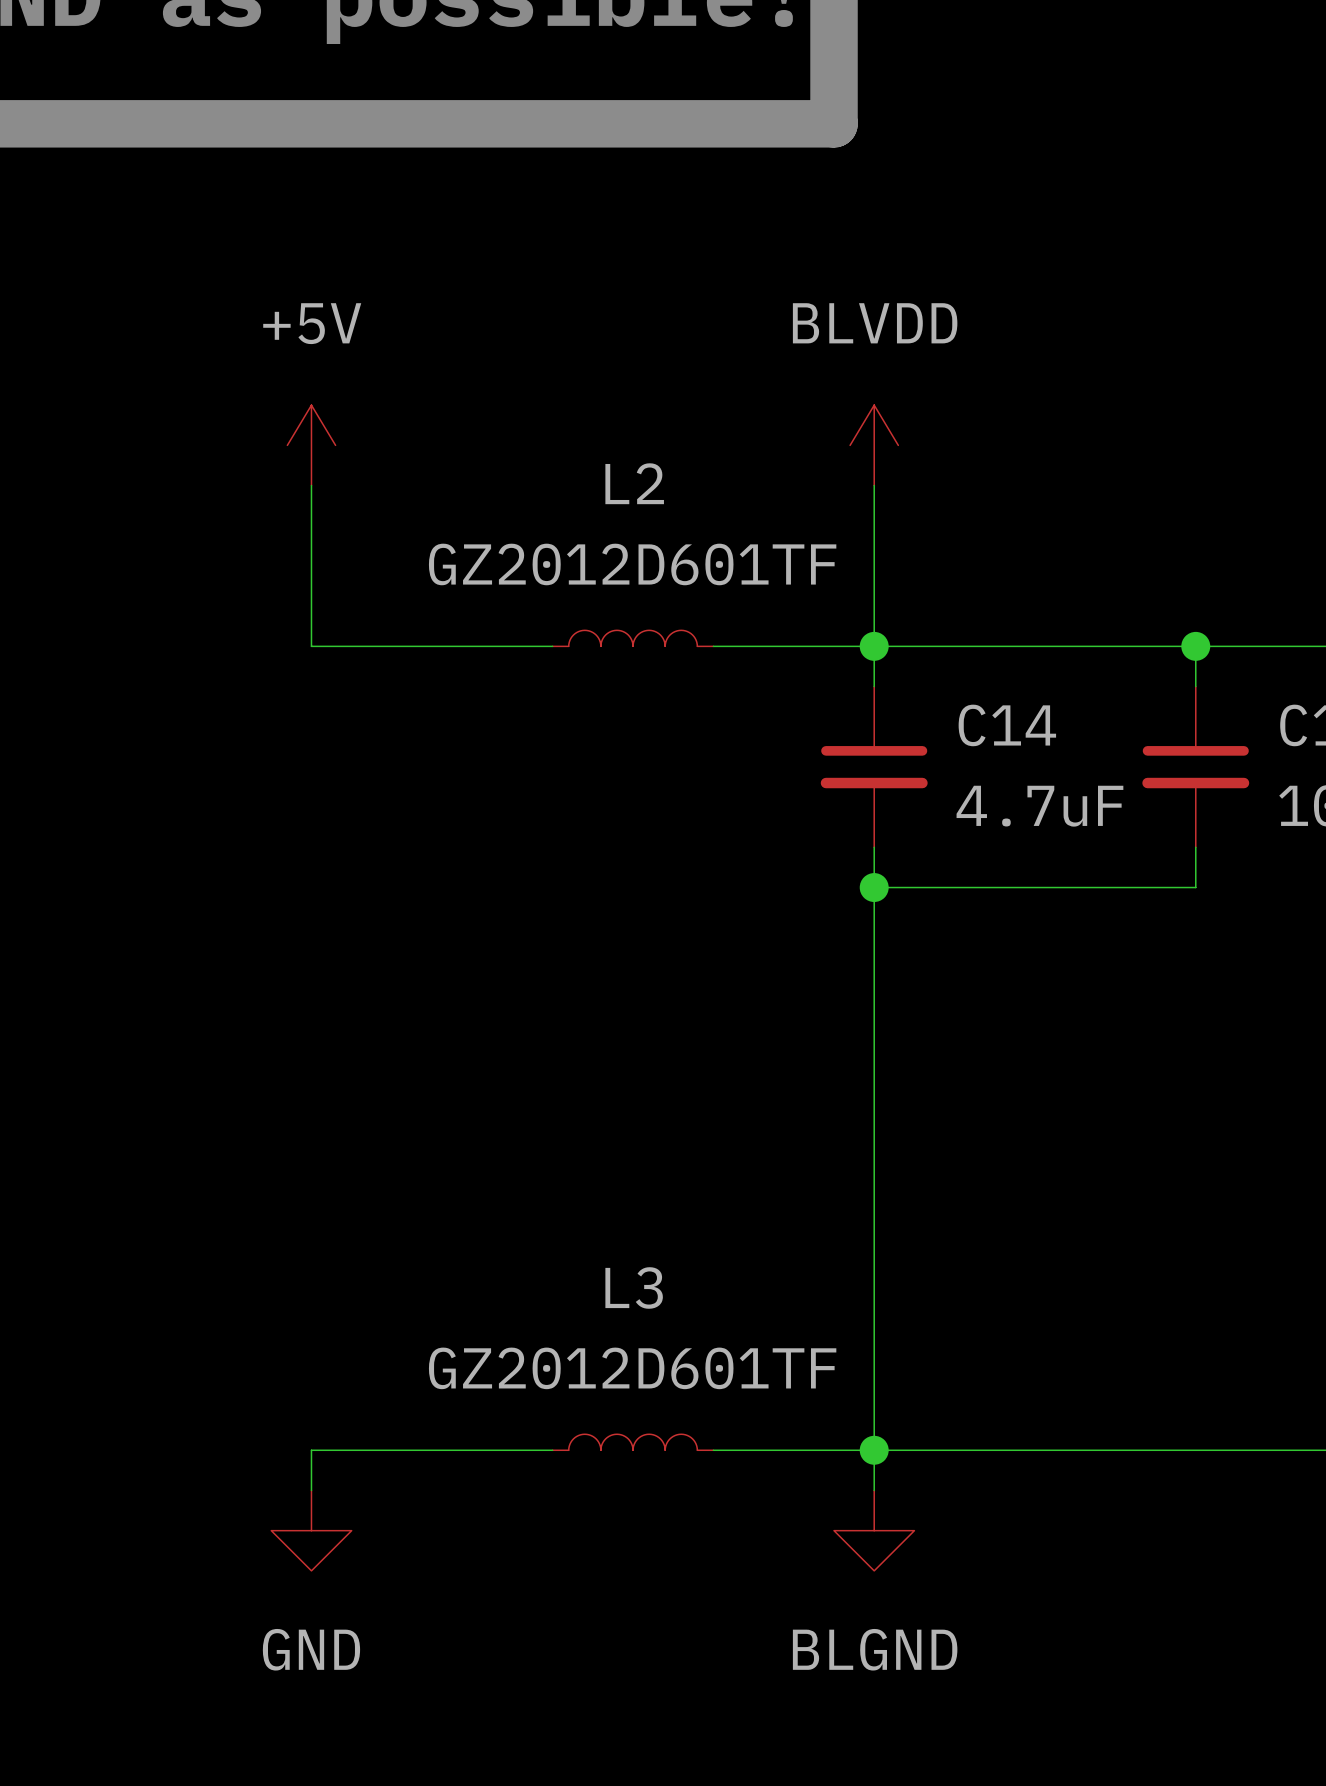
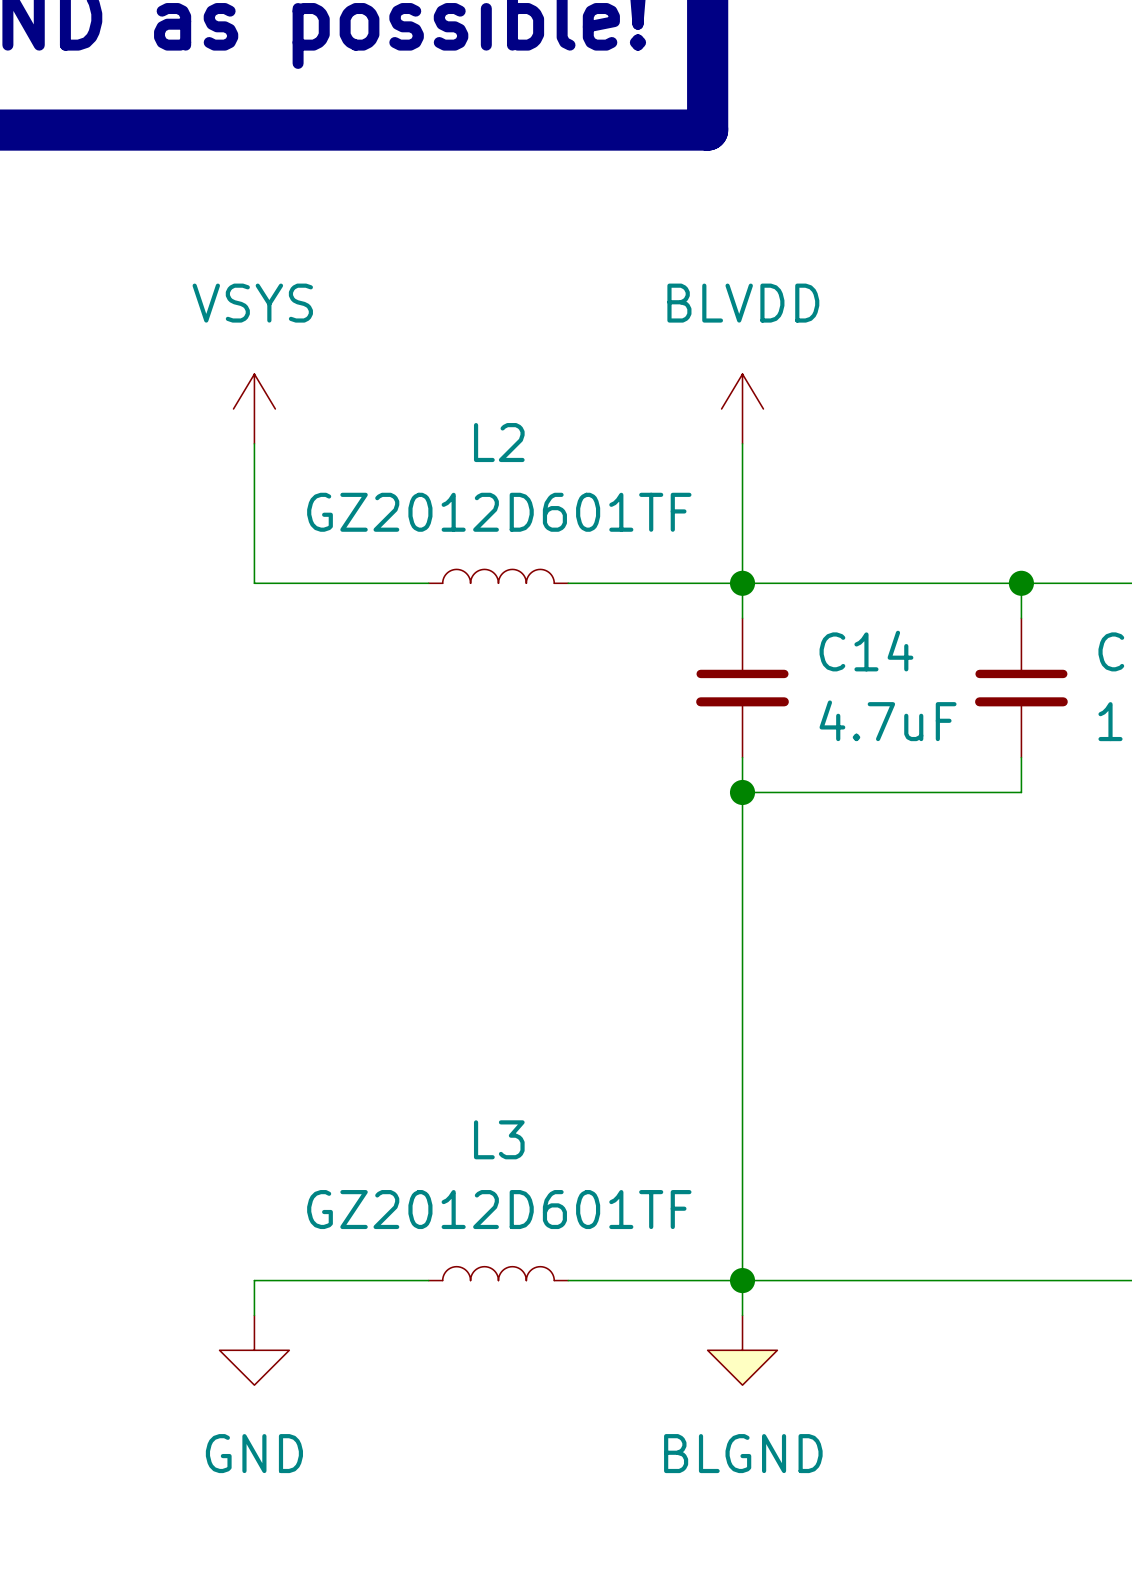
power symbol: +5V (311, 445) -> VSYS (254, 408)
L2 position: (633, 638) -> (498, 576)
wire: (512, 646) (552, 646) -> (568, 583) (603, 583)
L3 position: (633, 1442) -> (498, 1273)
wire: (512, 1450) (552, 1450) -> (568, 1280) (603, 1280)

